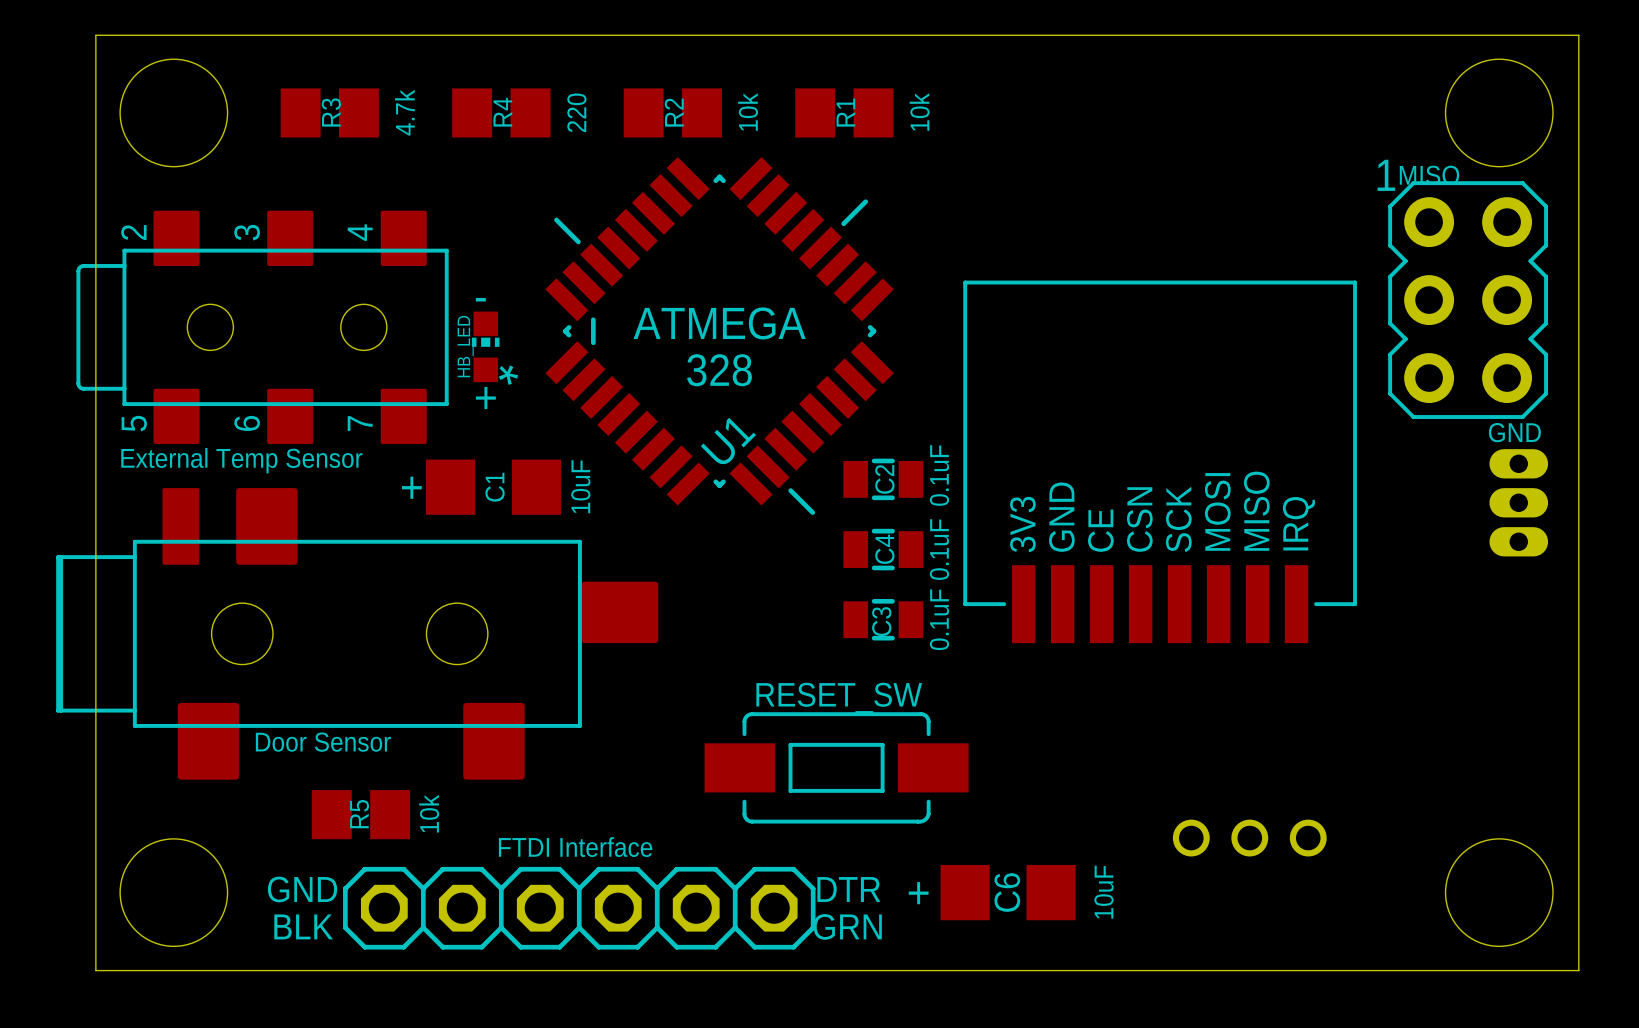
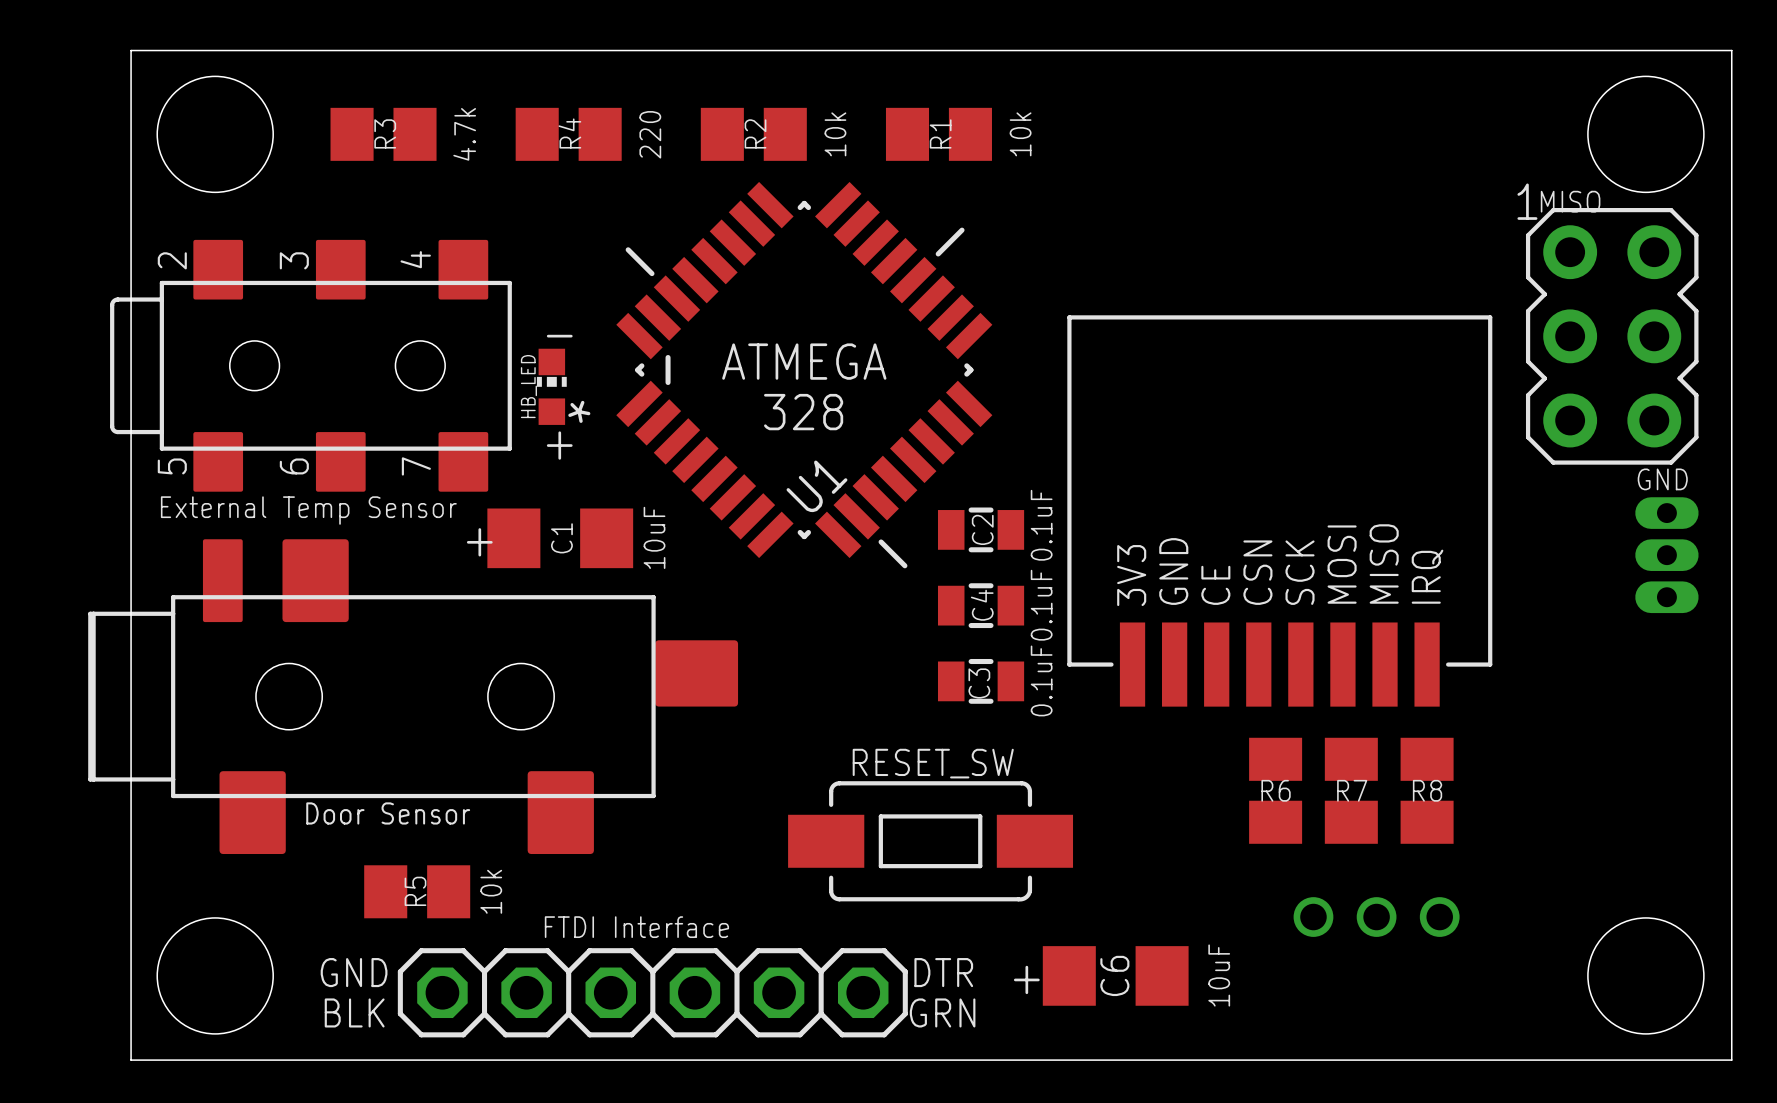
R6: none -> (1275, 790)
R7: none -> (1351, 790)
R8: none -> (1427, 790)

